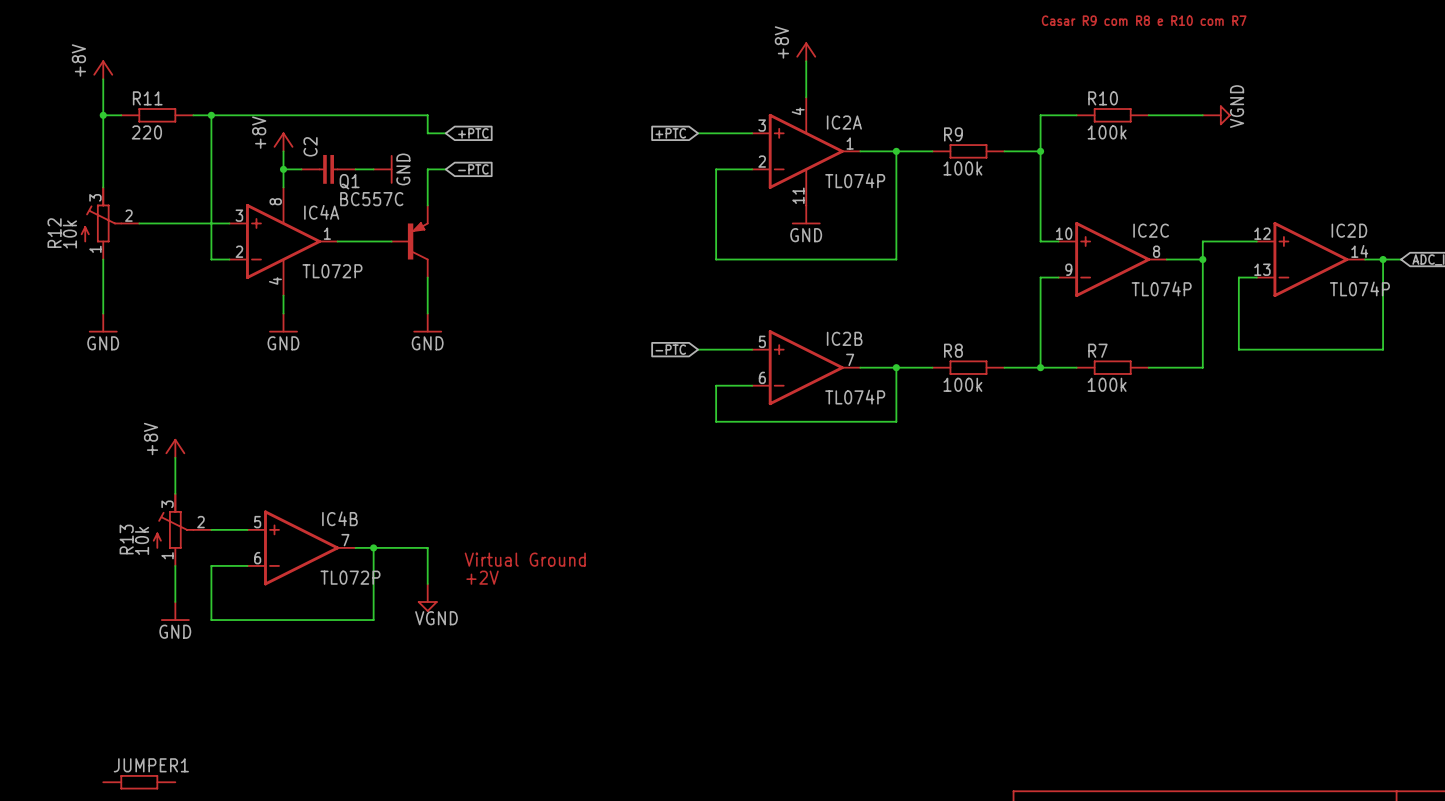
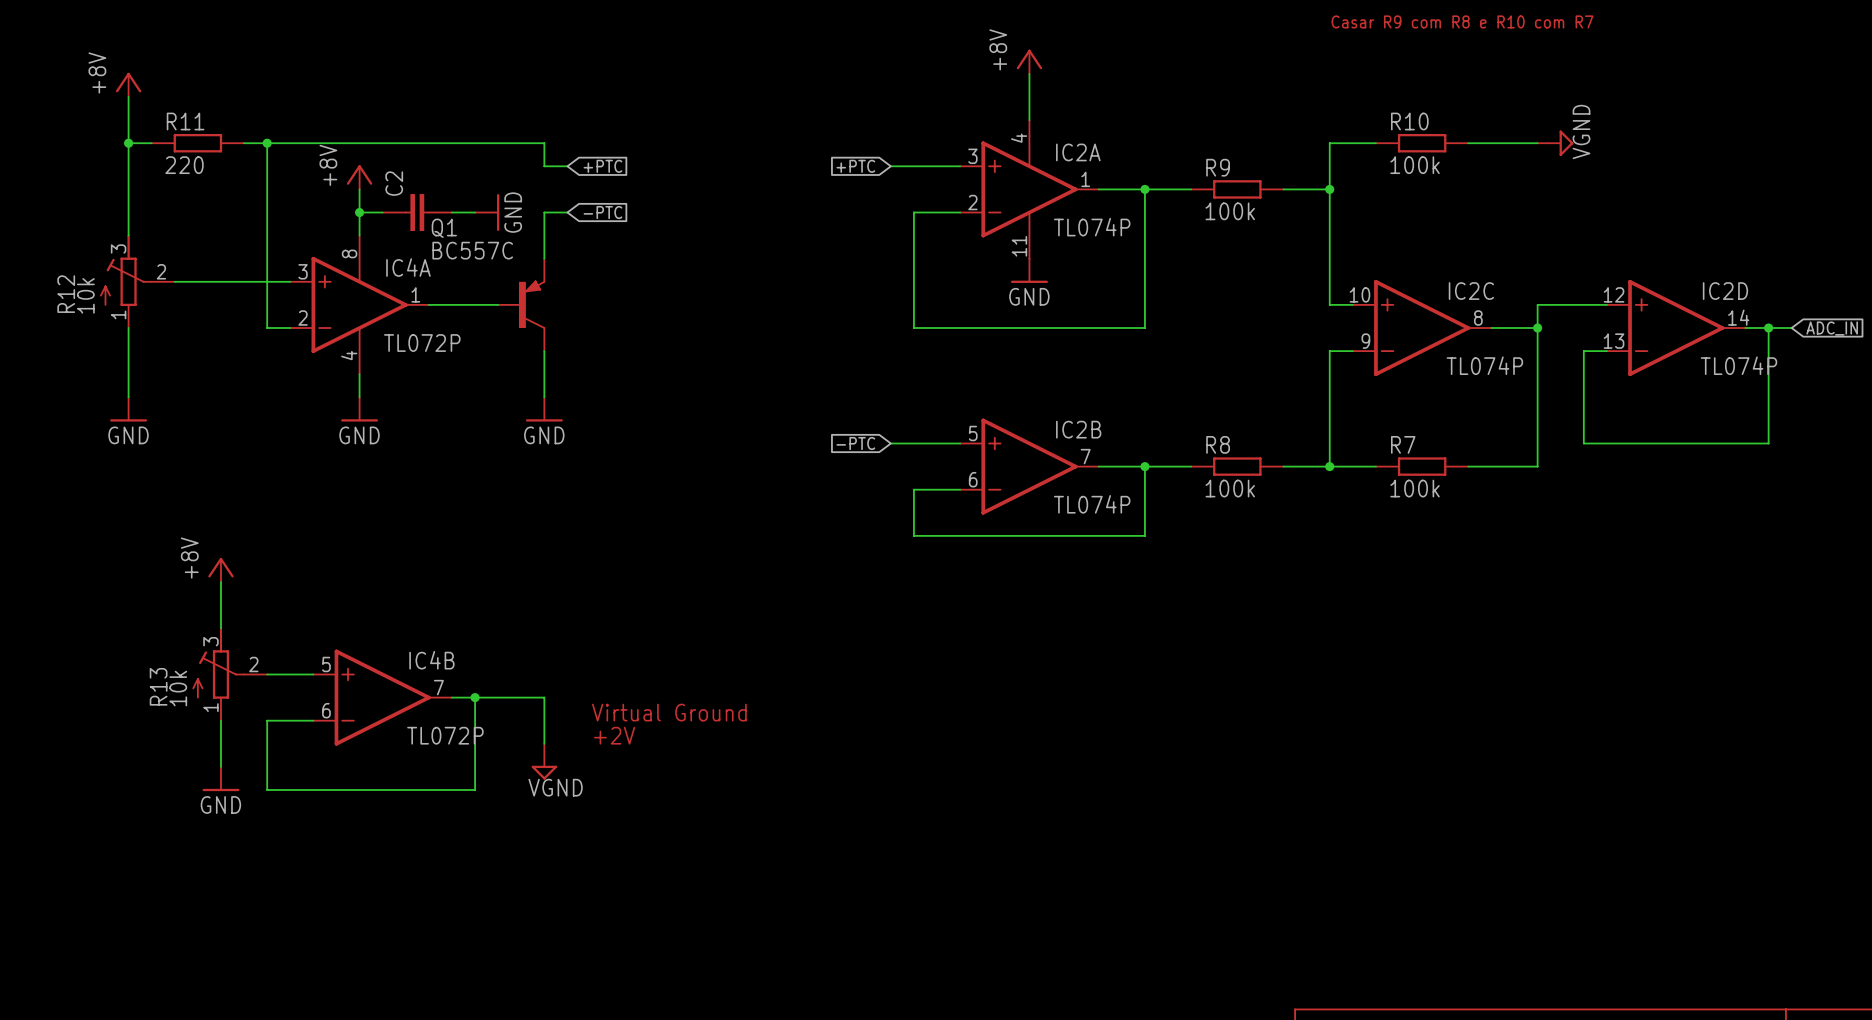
JUMPER1: (139, 782) -> none

